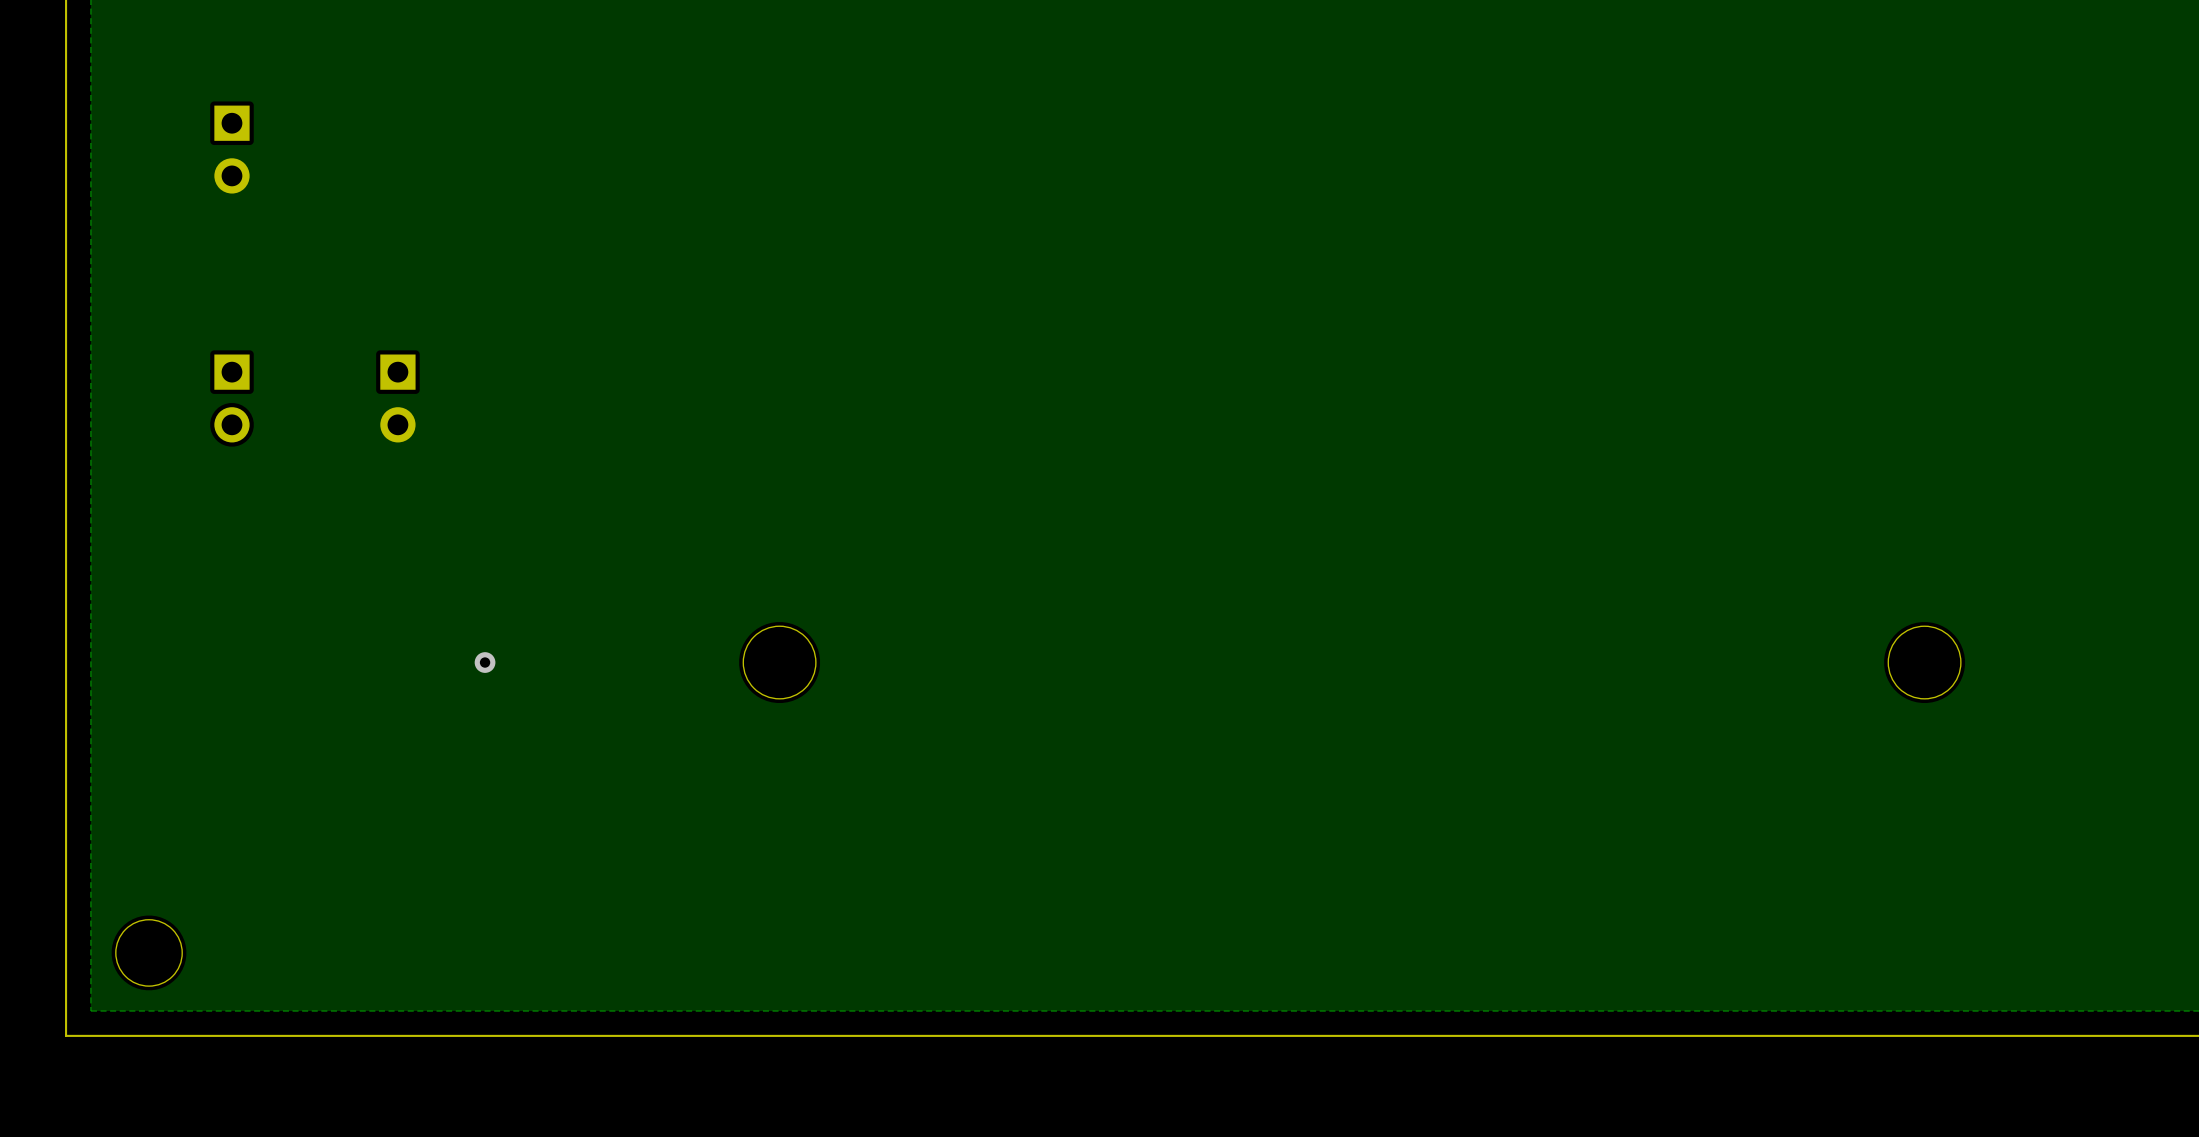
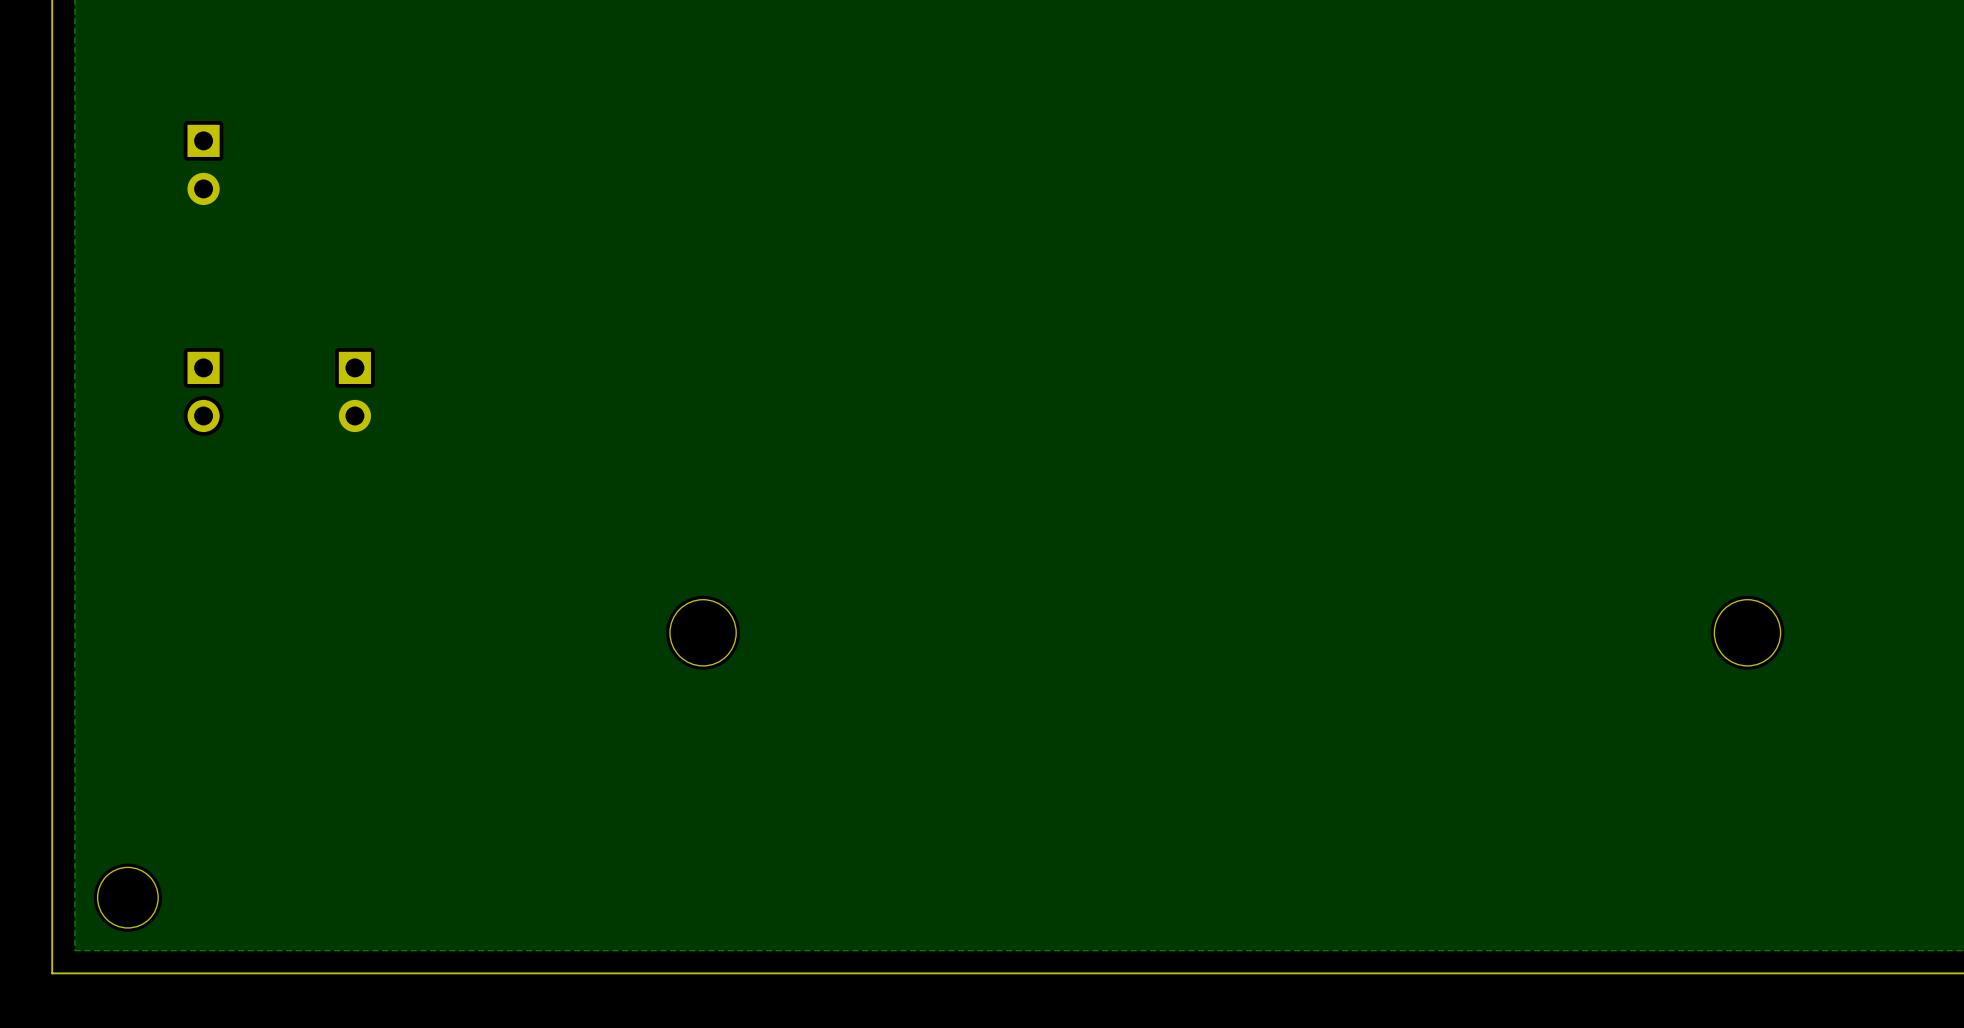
via: (485, 662) -> none

